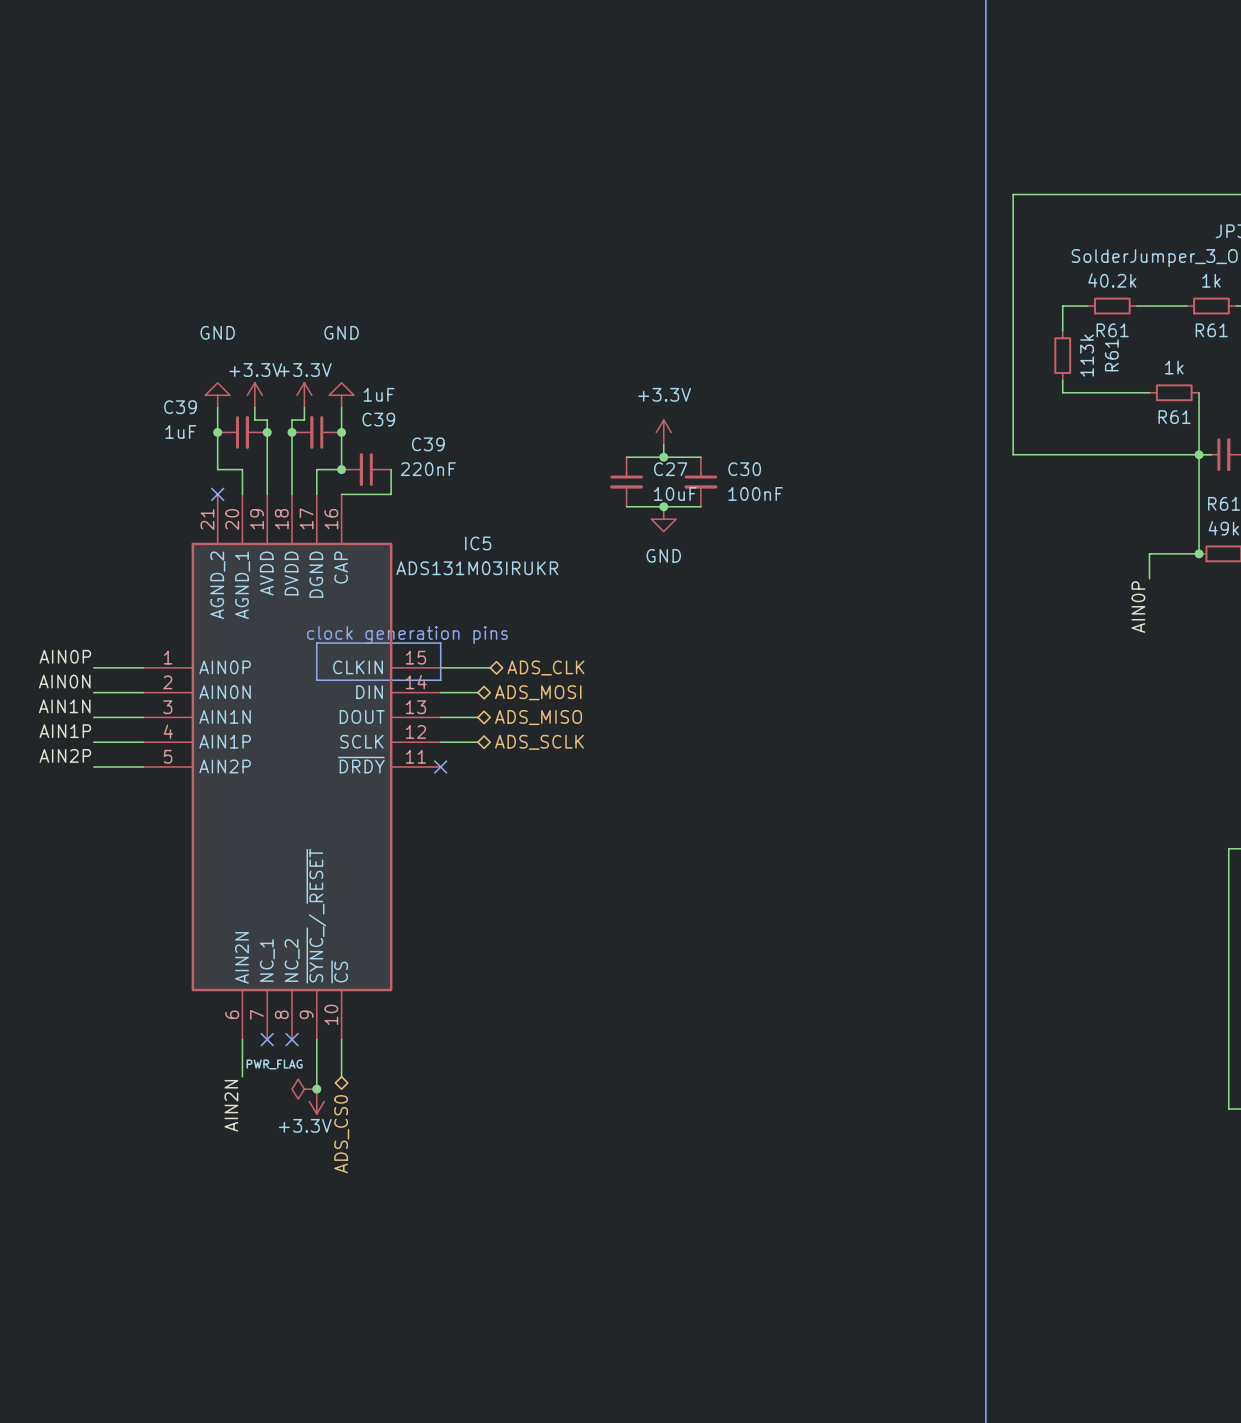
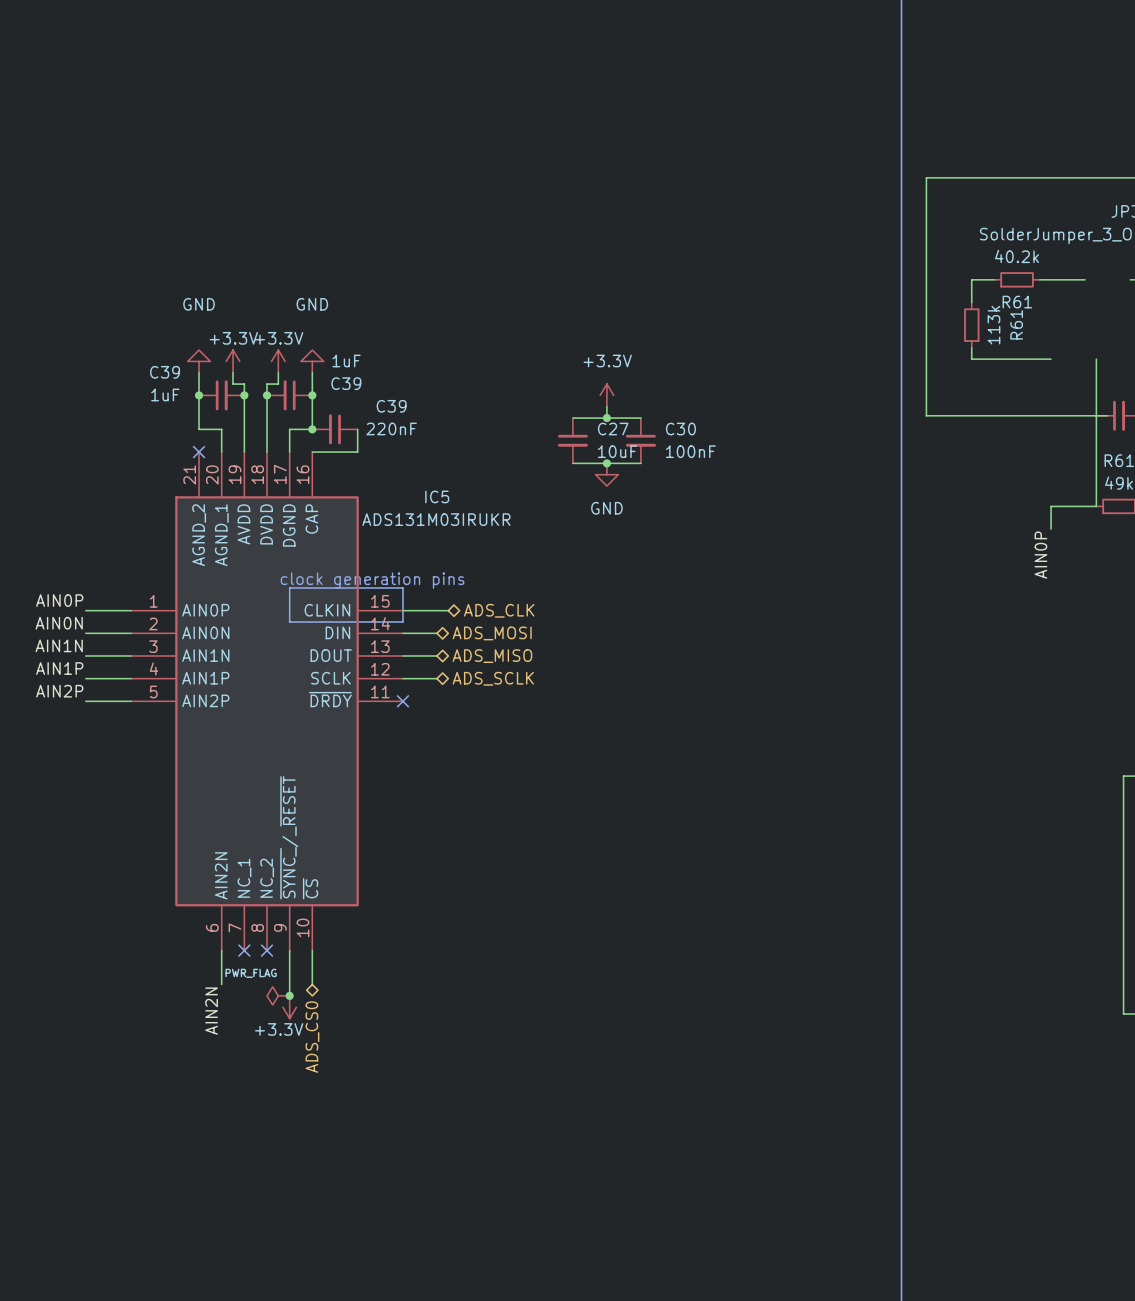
R61: 1k (1211, 306) -> none
R61: 1k (1174, 392) -> none
junction: (1199, 454) -> none
junction: (1199, 553) -> none

